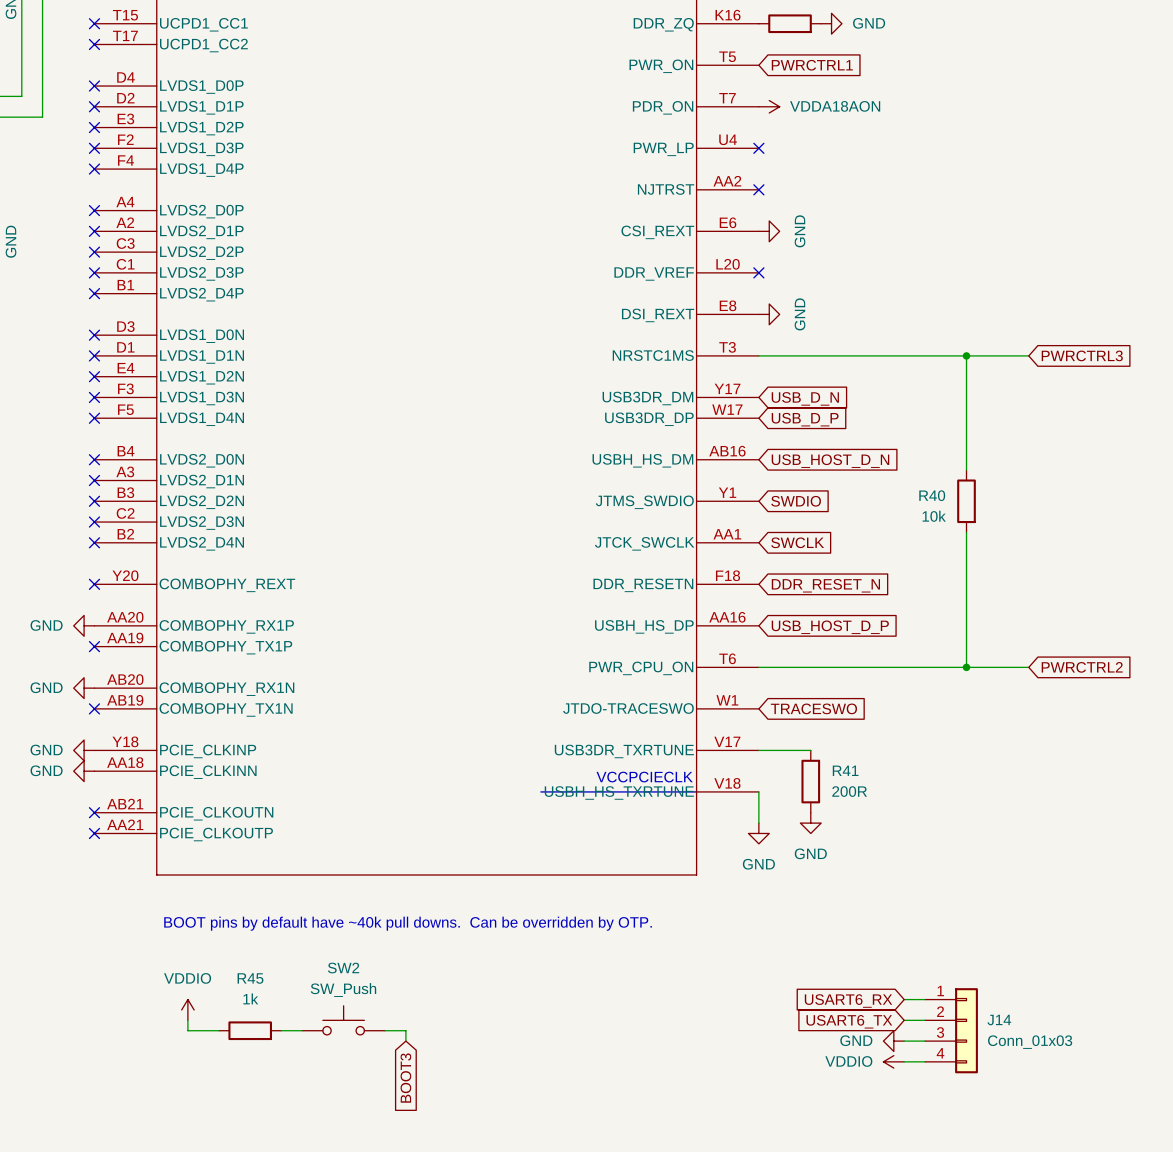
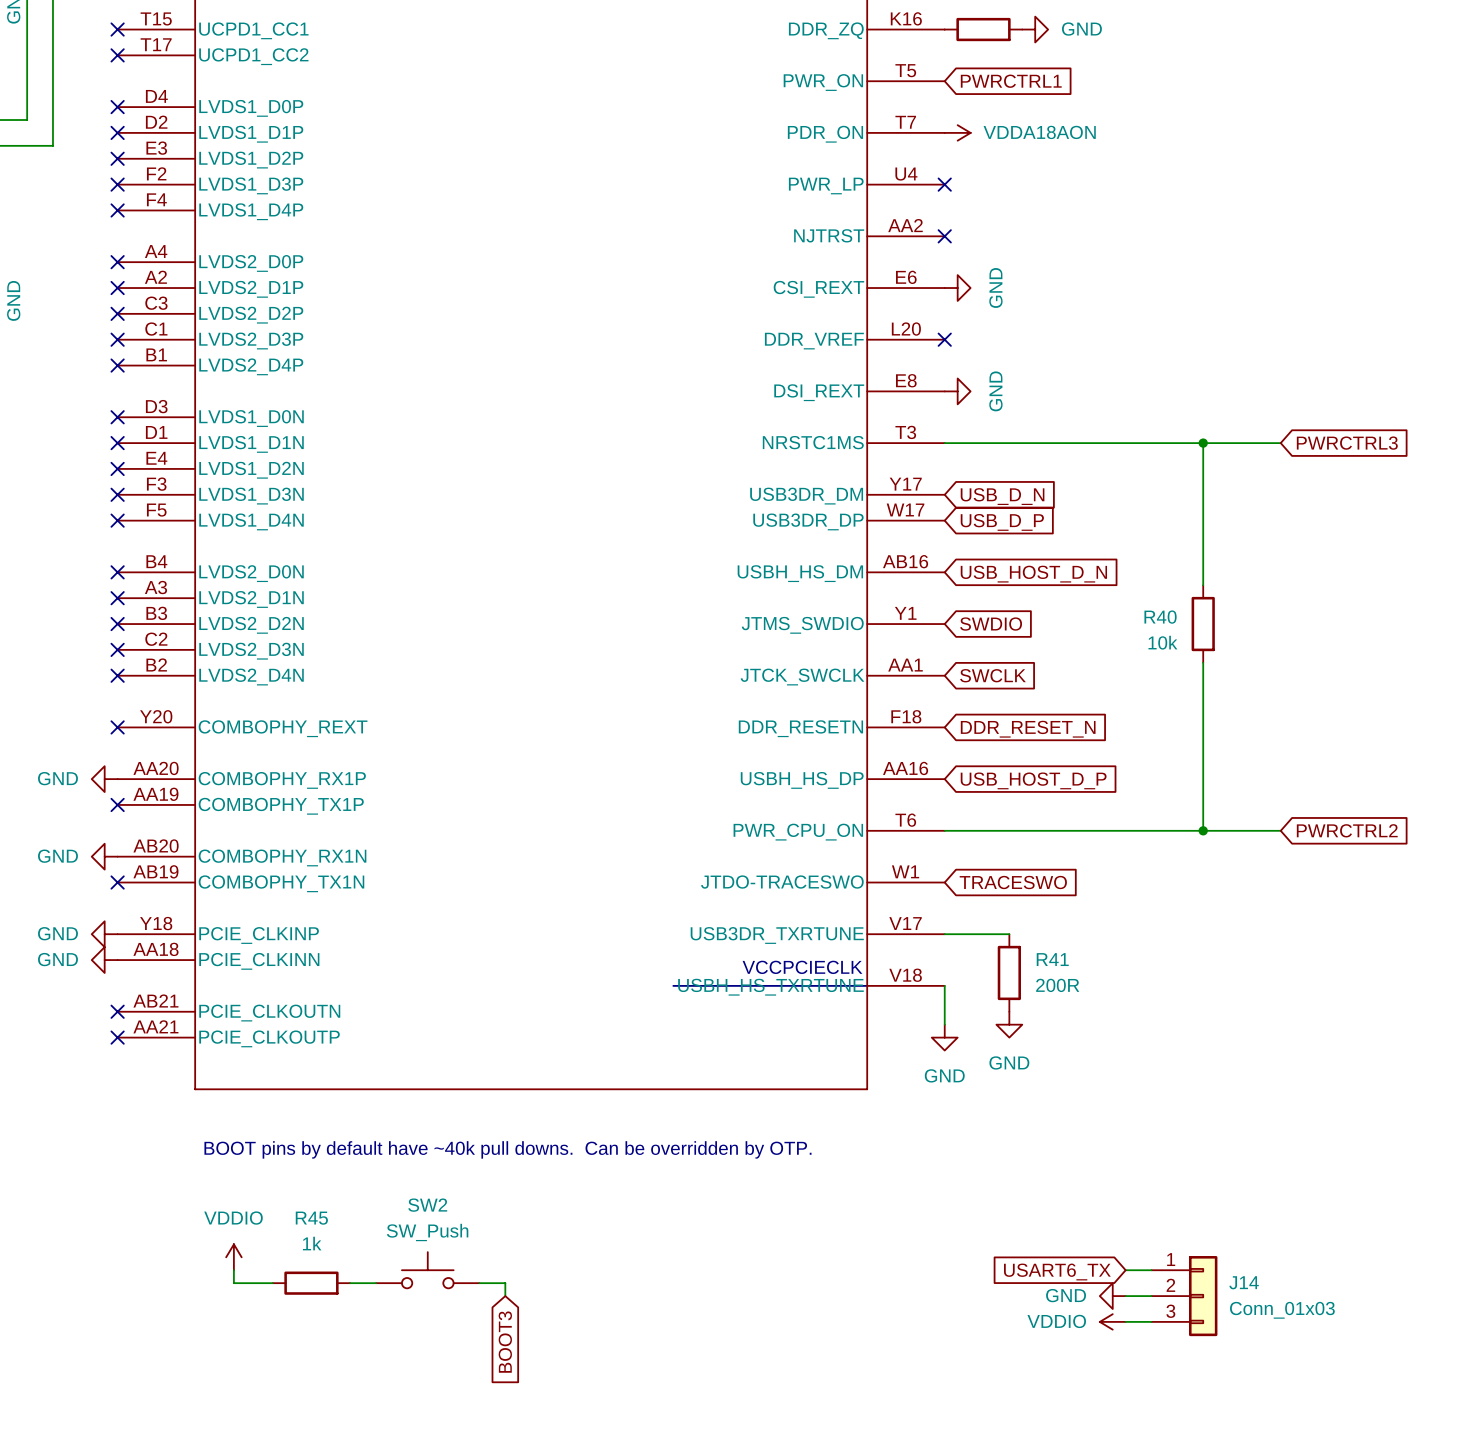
J14 symbol: [924, 988, 978, 1074] -> [1151, 1256, 1218, 1337]
wire: (904, 999) (924, 999) -> none
global label: USART6_RX (848, 1001) -> none

